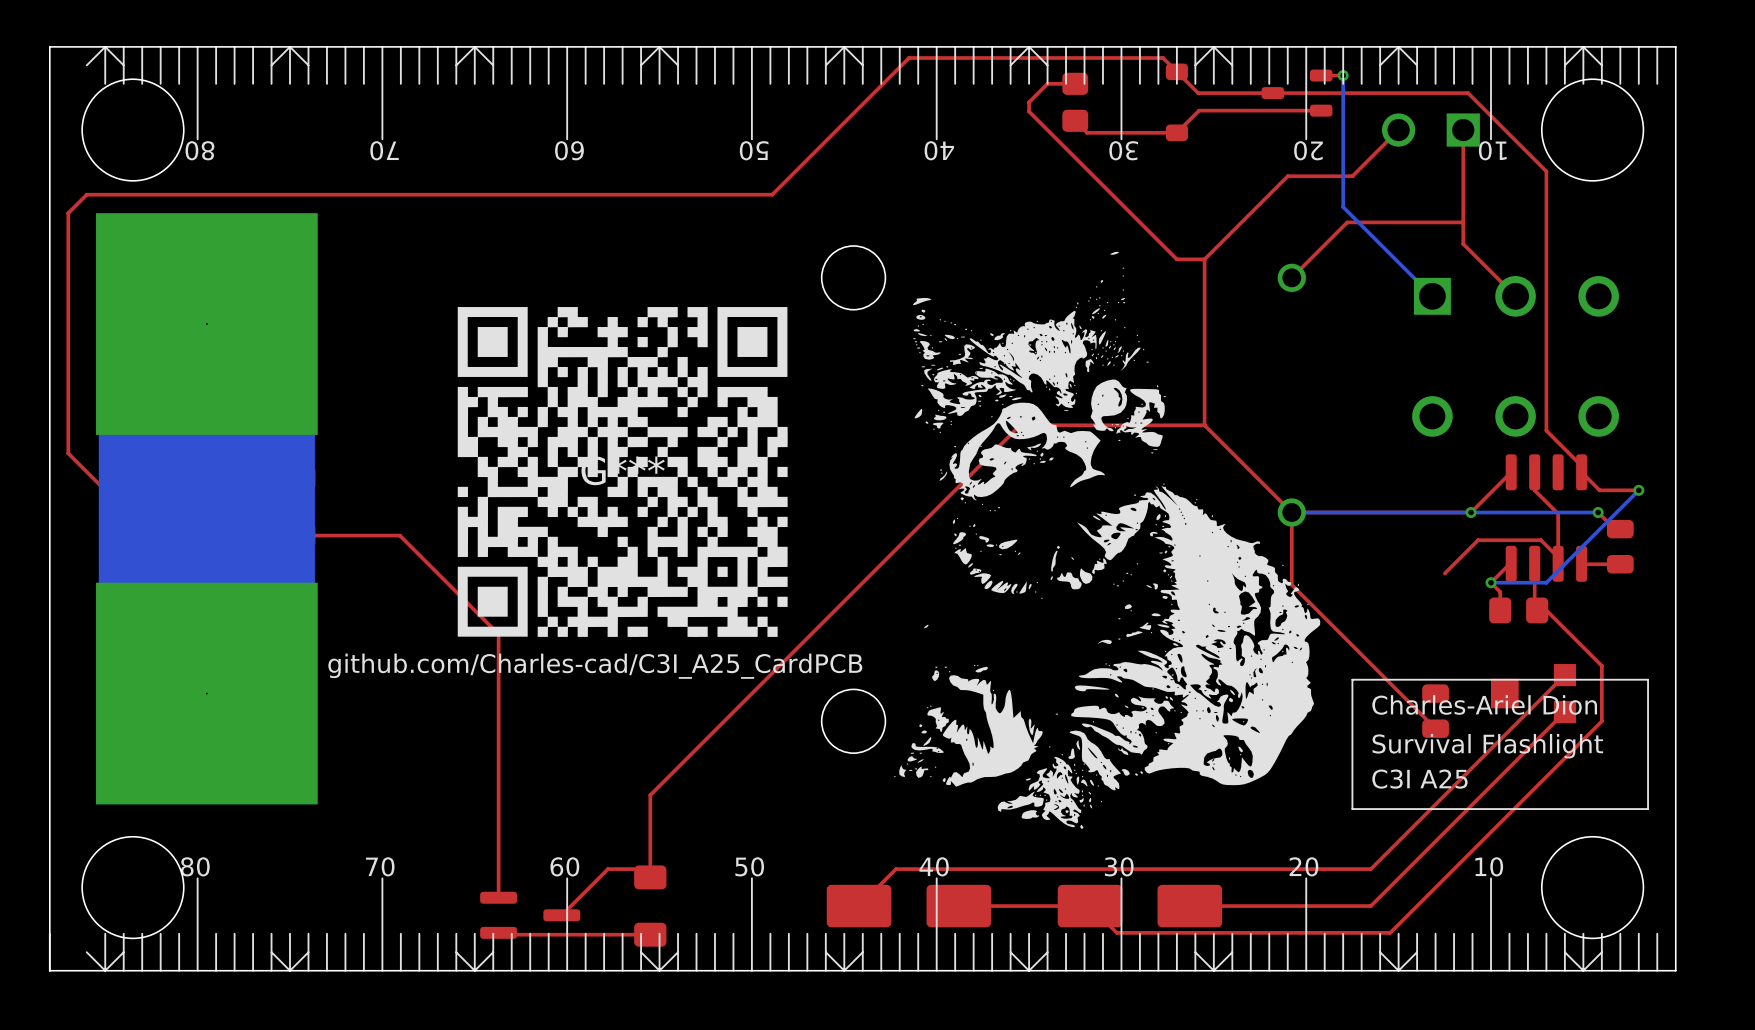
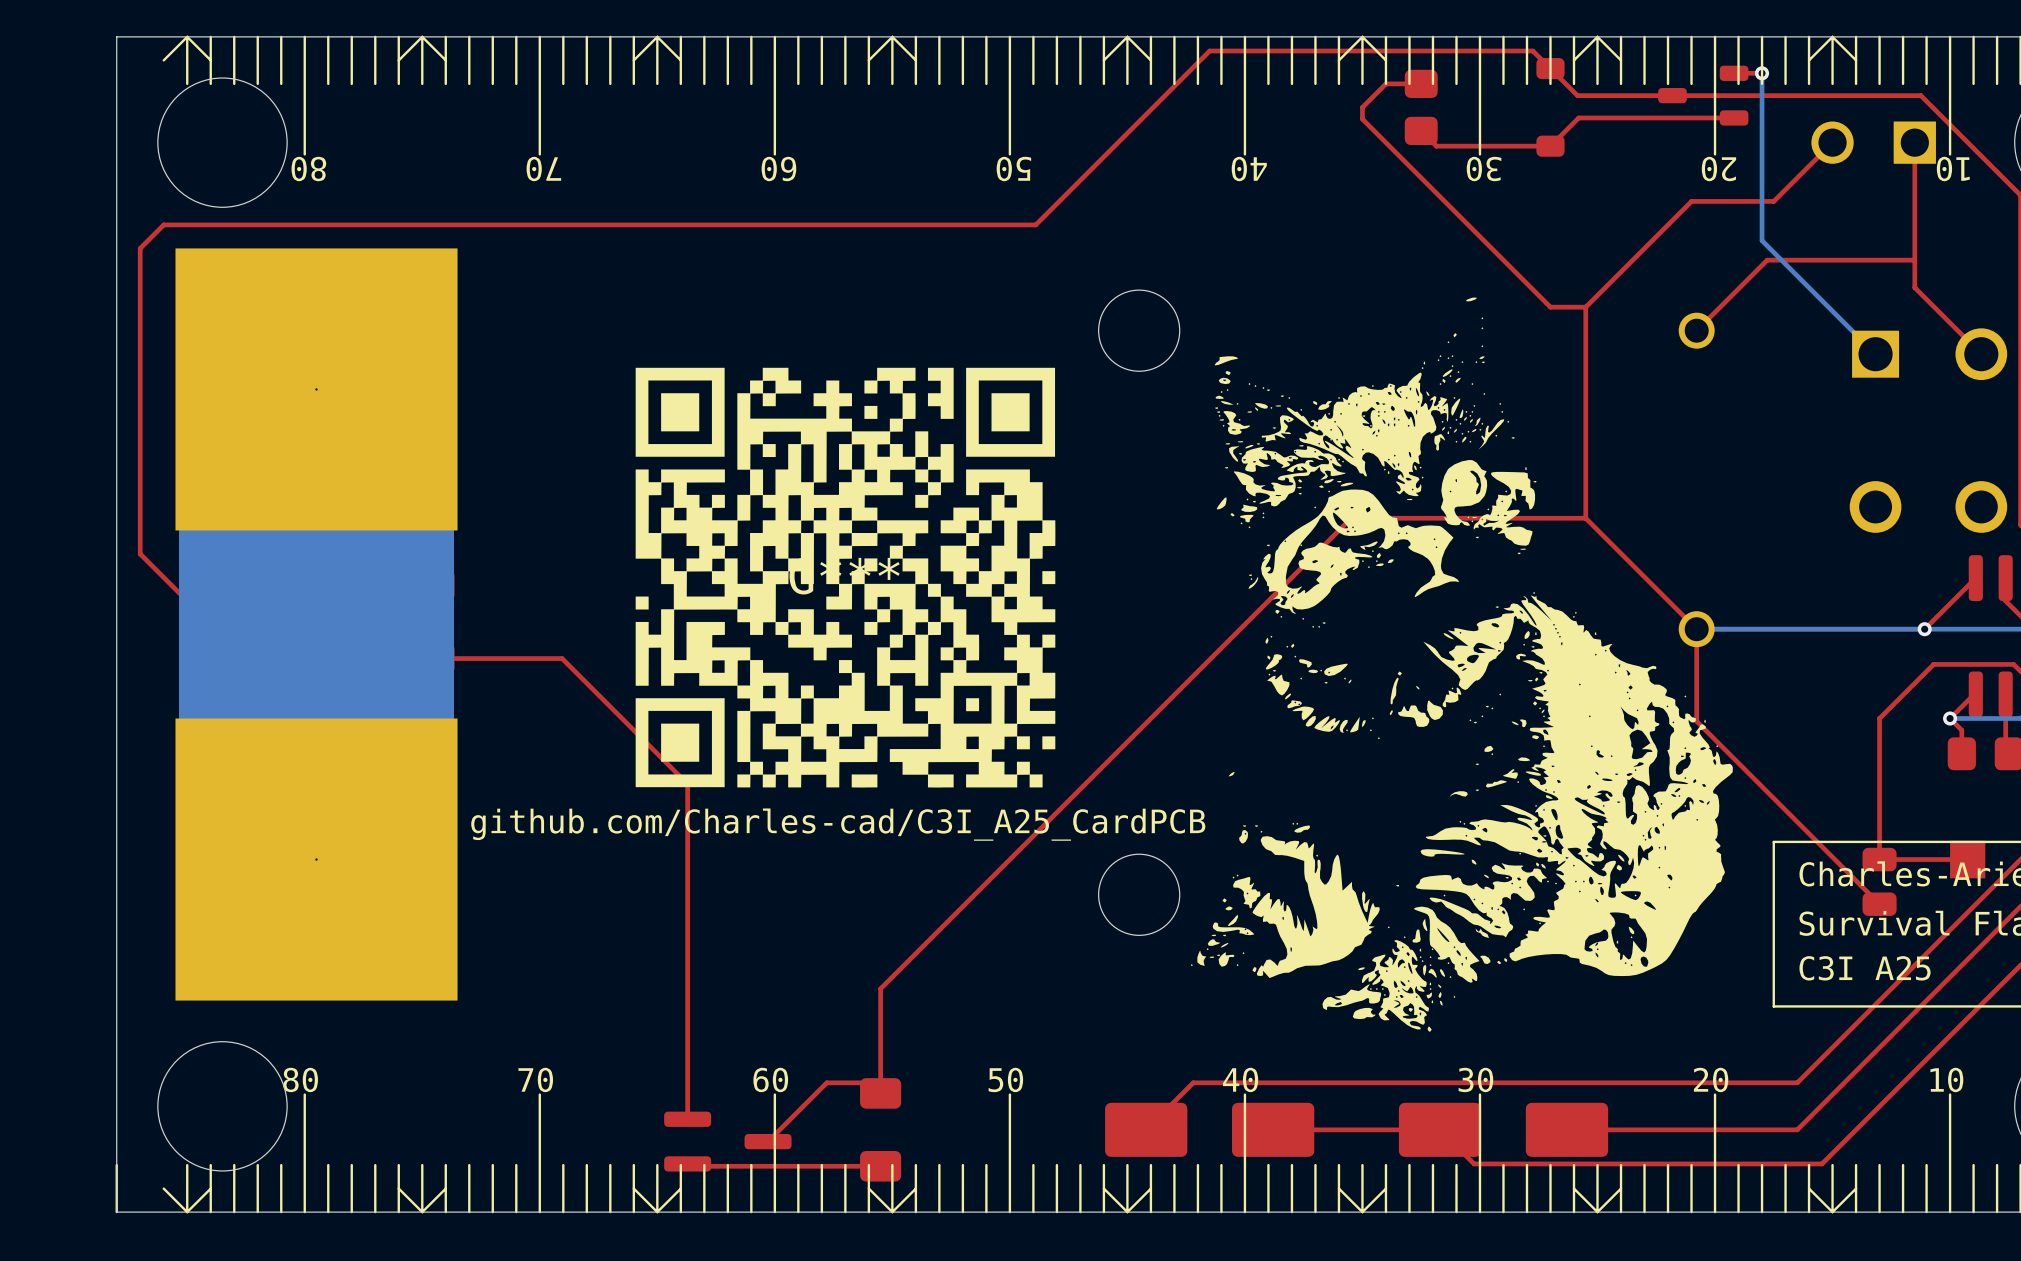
top track: none -> (1891, 706) (1879, 718) (1879, 859) (1967, 859)

